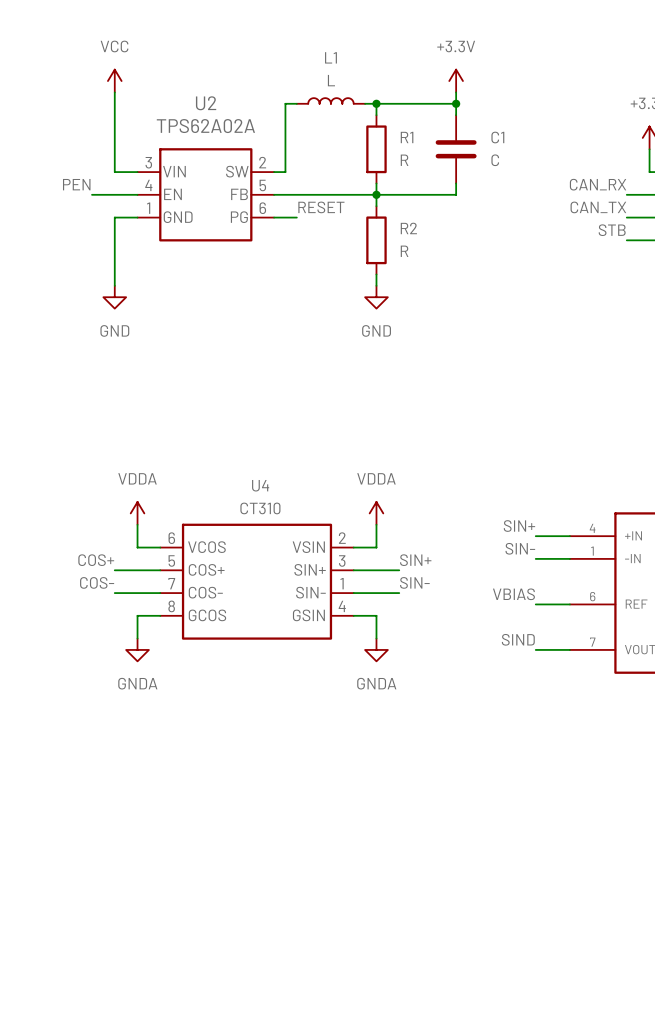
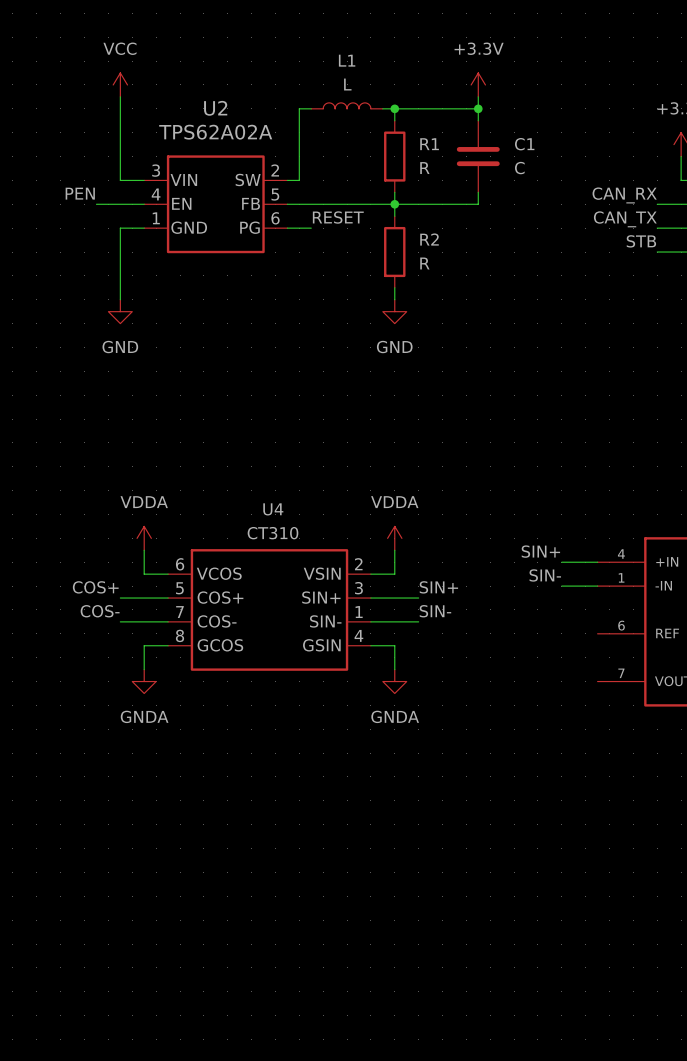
label: VBIAS (513, 594) -> none
wire: (535, 604) (569, 604) -> none
label: SIND (518, 639) -> none
wire: (535, 649) (569, 649) -> none

